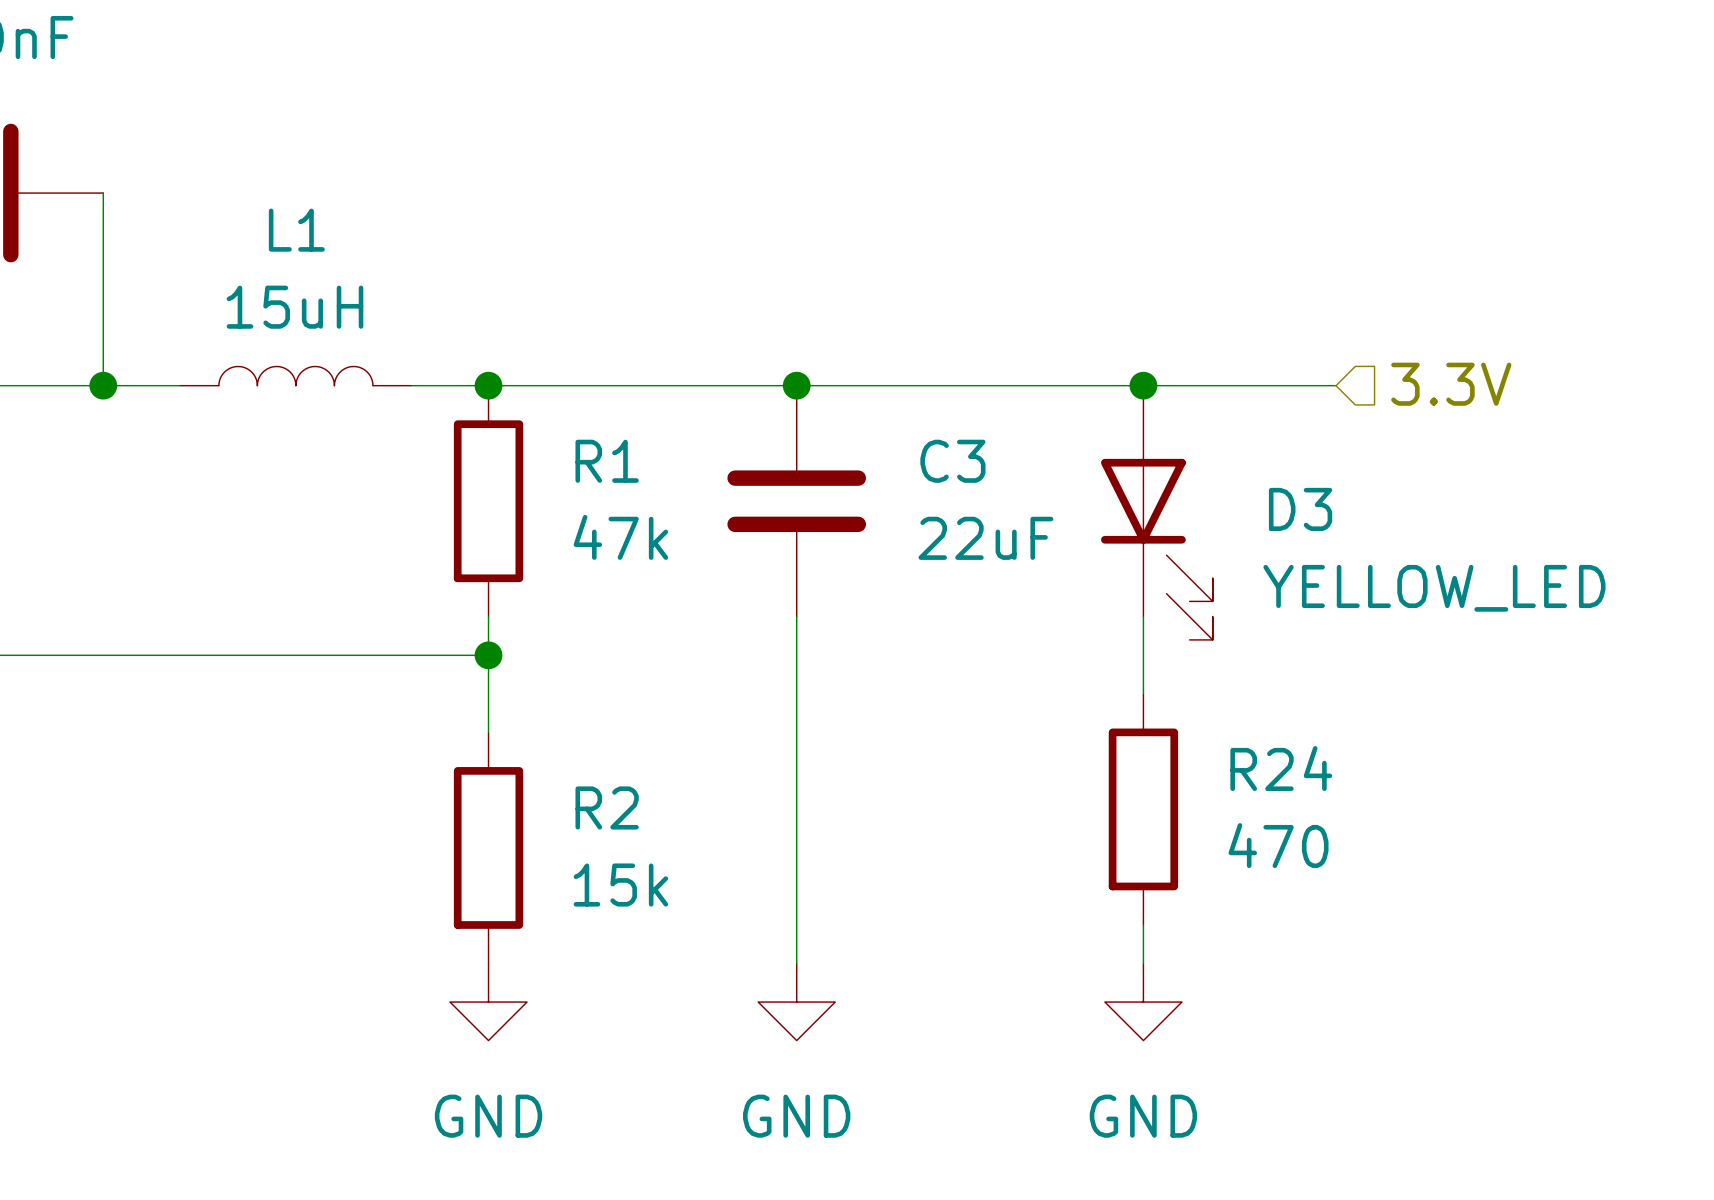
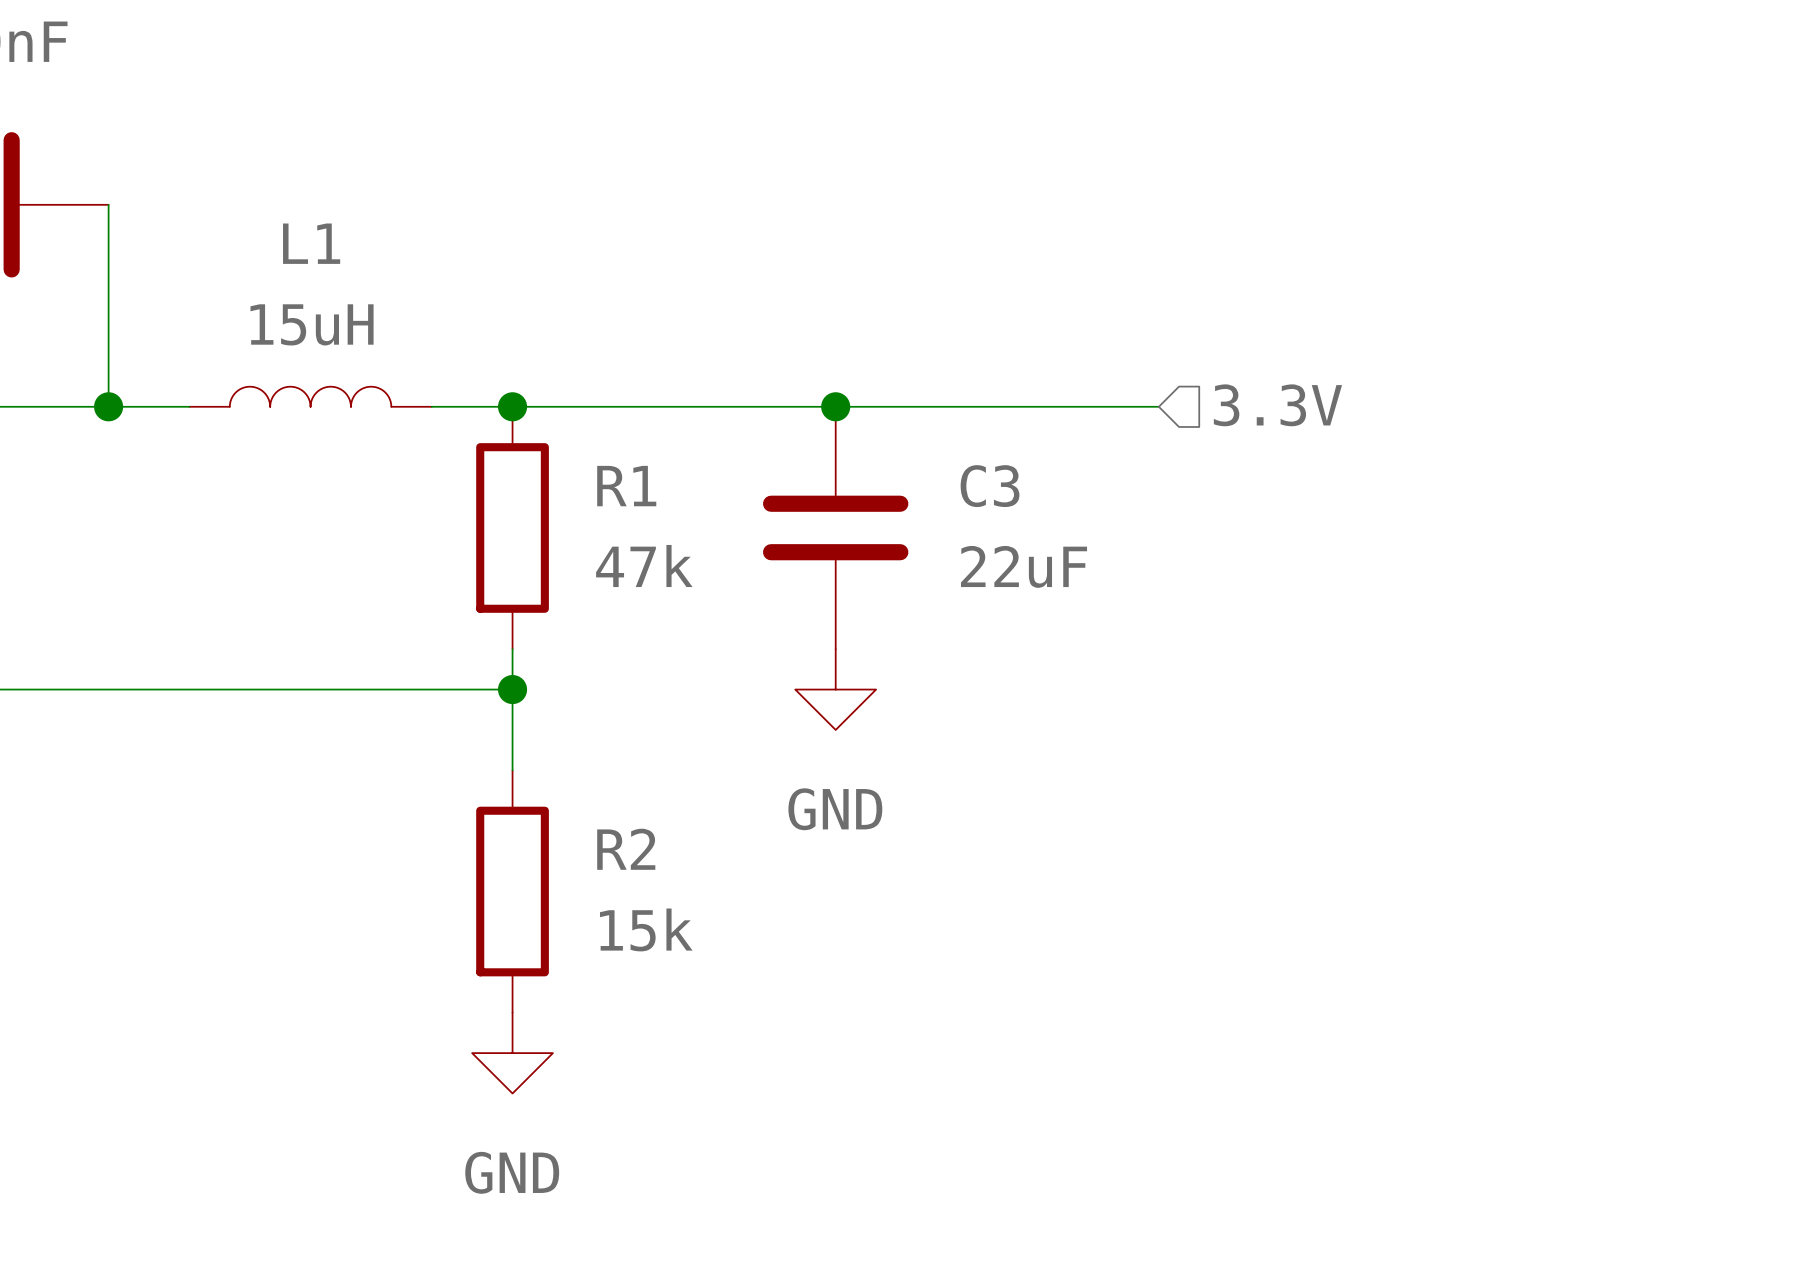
hierarchical label position: 3.3V (1451, 384) -> 3.3V (1277, 405)
wire: (1104, 385) (1336, 385) -> none
junction: (1143, 385) -> none
D3: YELLOW_LED (1156, 512) -> none
wire: (796, 616) (796, 963) -> none
wire: (1143, 616) (1143, 693) -> none
power symbol: none -> GND (835, 689)
R24: 470 (1143, 809) -> none
wire: (1143, 924) (1143, 963) -> none
power symbol: GND (796, 1002) -> none
power symbol: GND (1143, 1002) -> none

